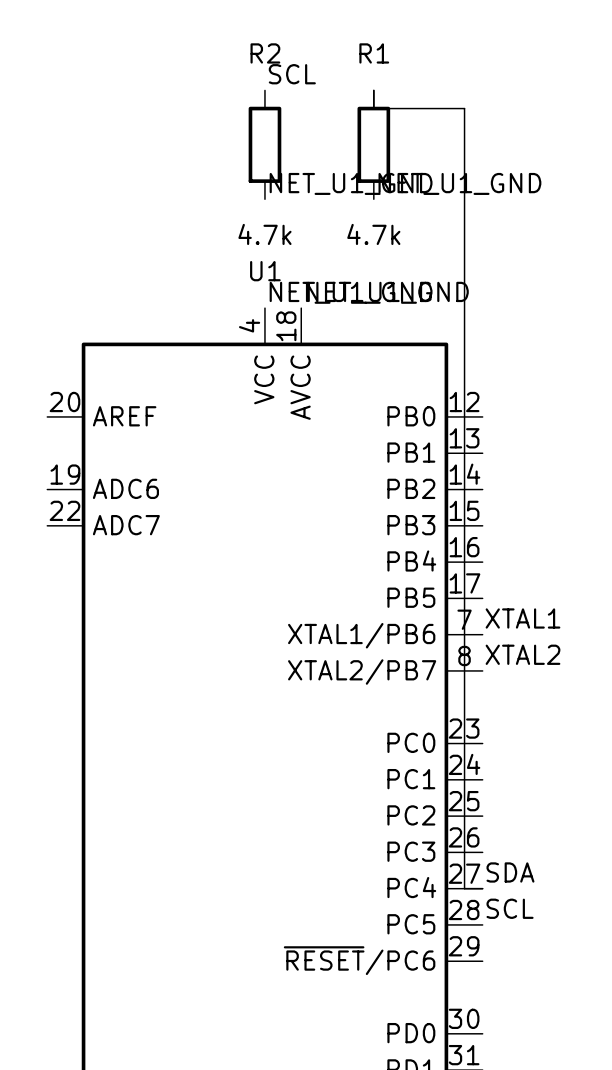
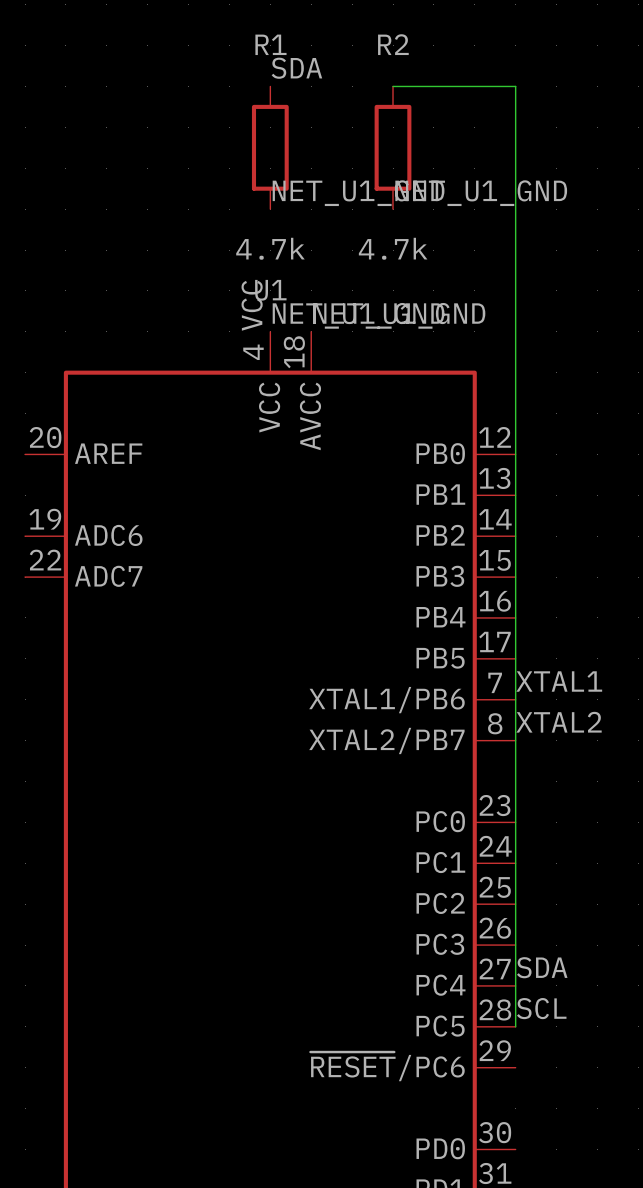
R2 name: R2 (265, 53) -> R1 (270, 44)
R1 name: R1 (374, 53) -> R2 (393, 44)
label: SCL (292, 74) -> SDA (296, 68)
wire: (373, 90) (373, 108) (464, 108) (464, 888) (482, 888) -> (393, 86) (515, 86) (515, 1026)
label: none -> VCC (252, 305)

